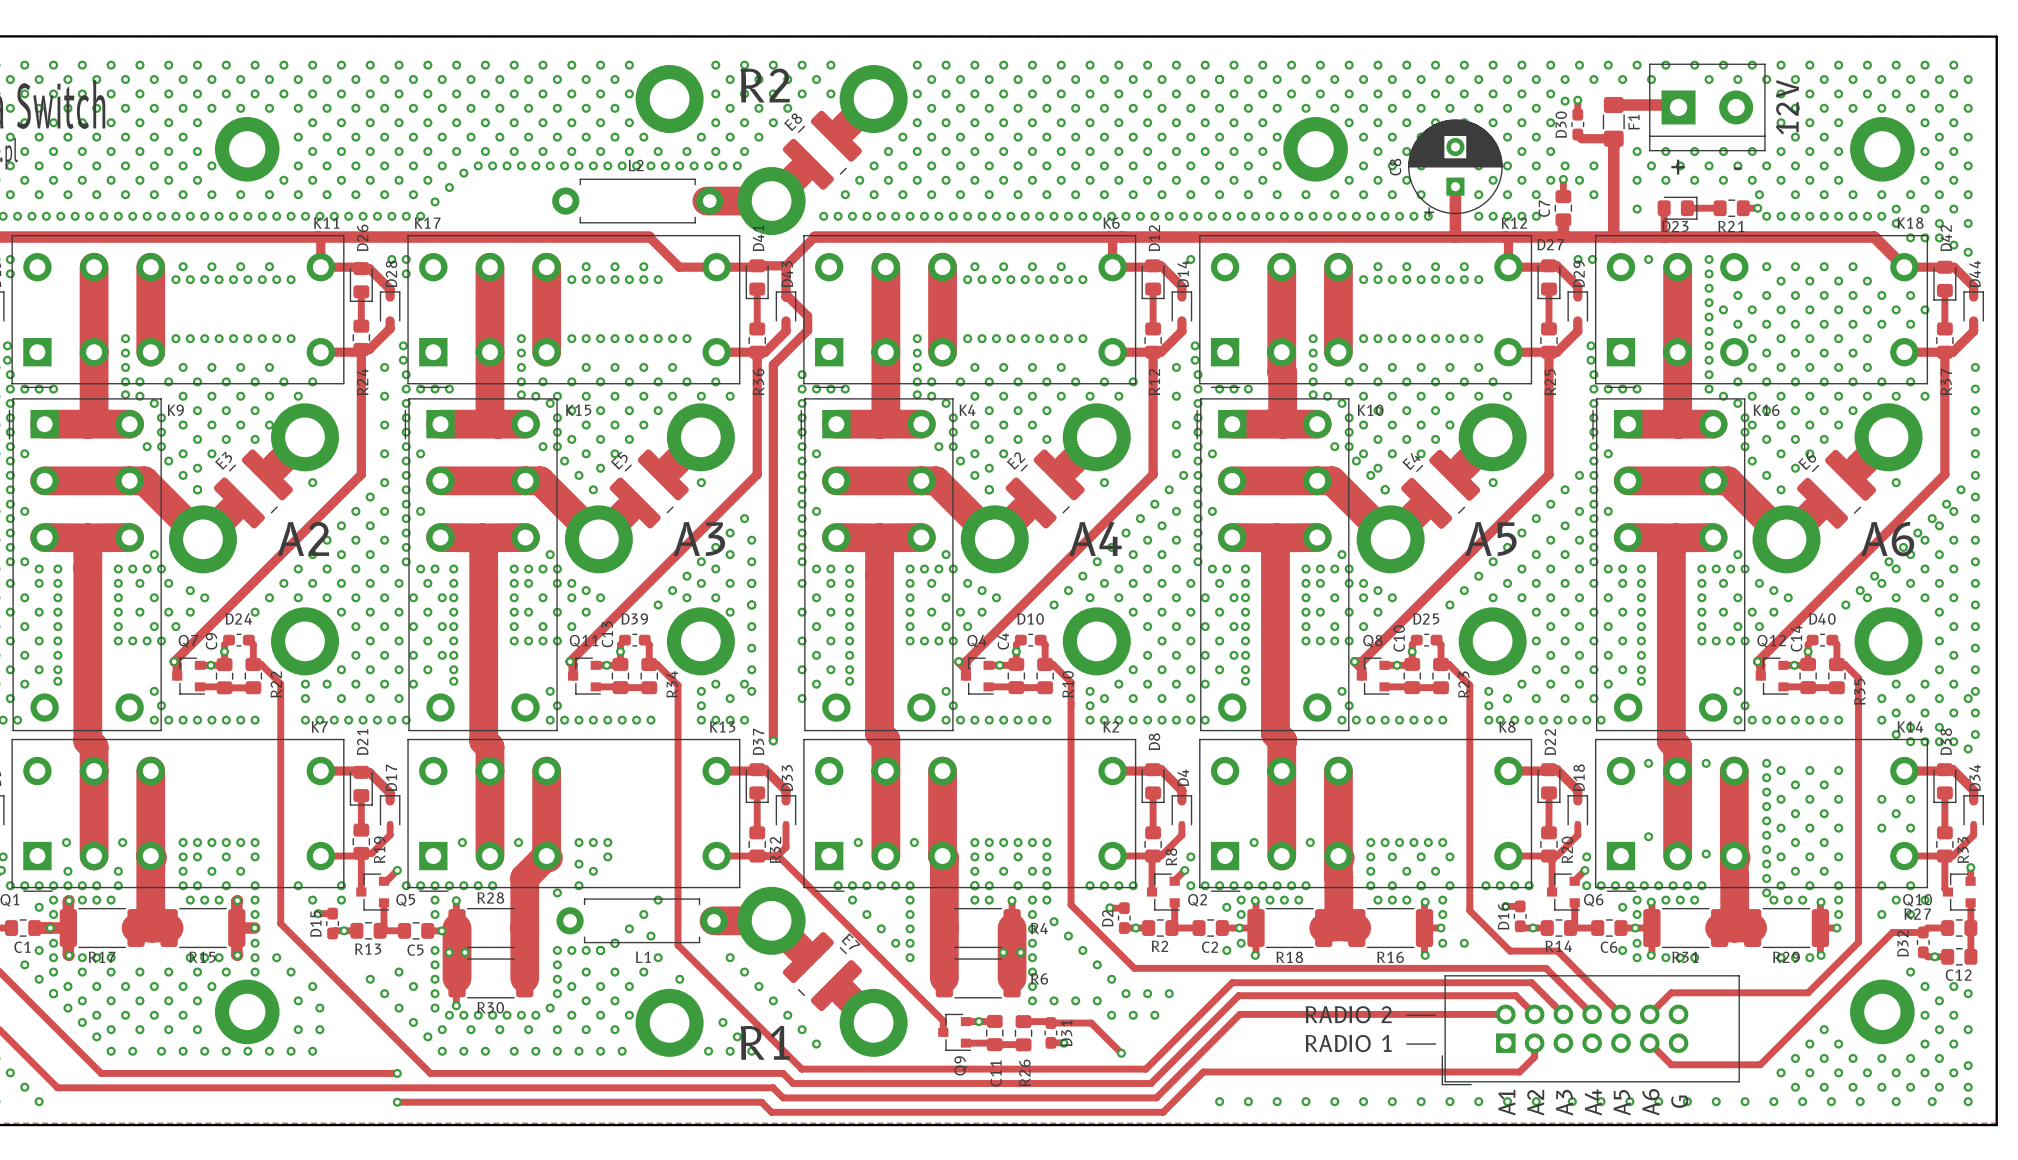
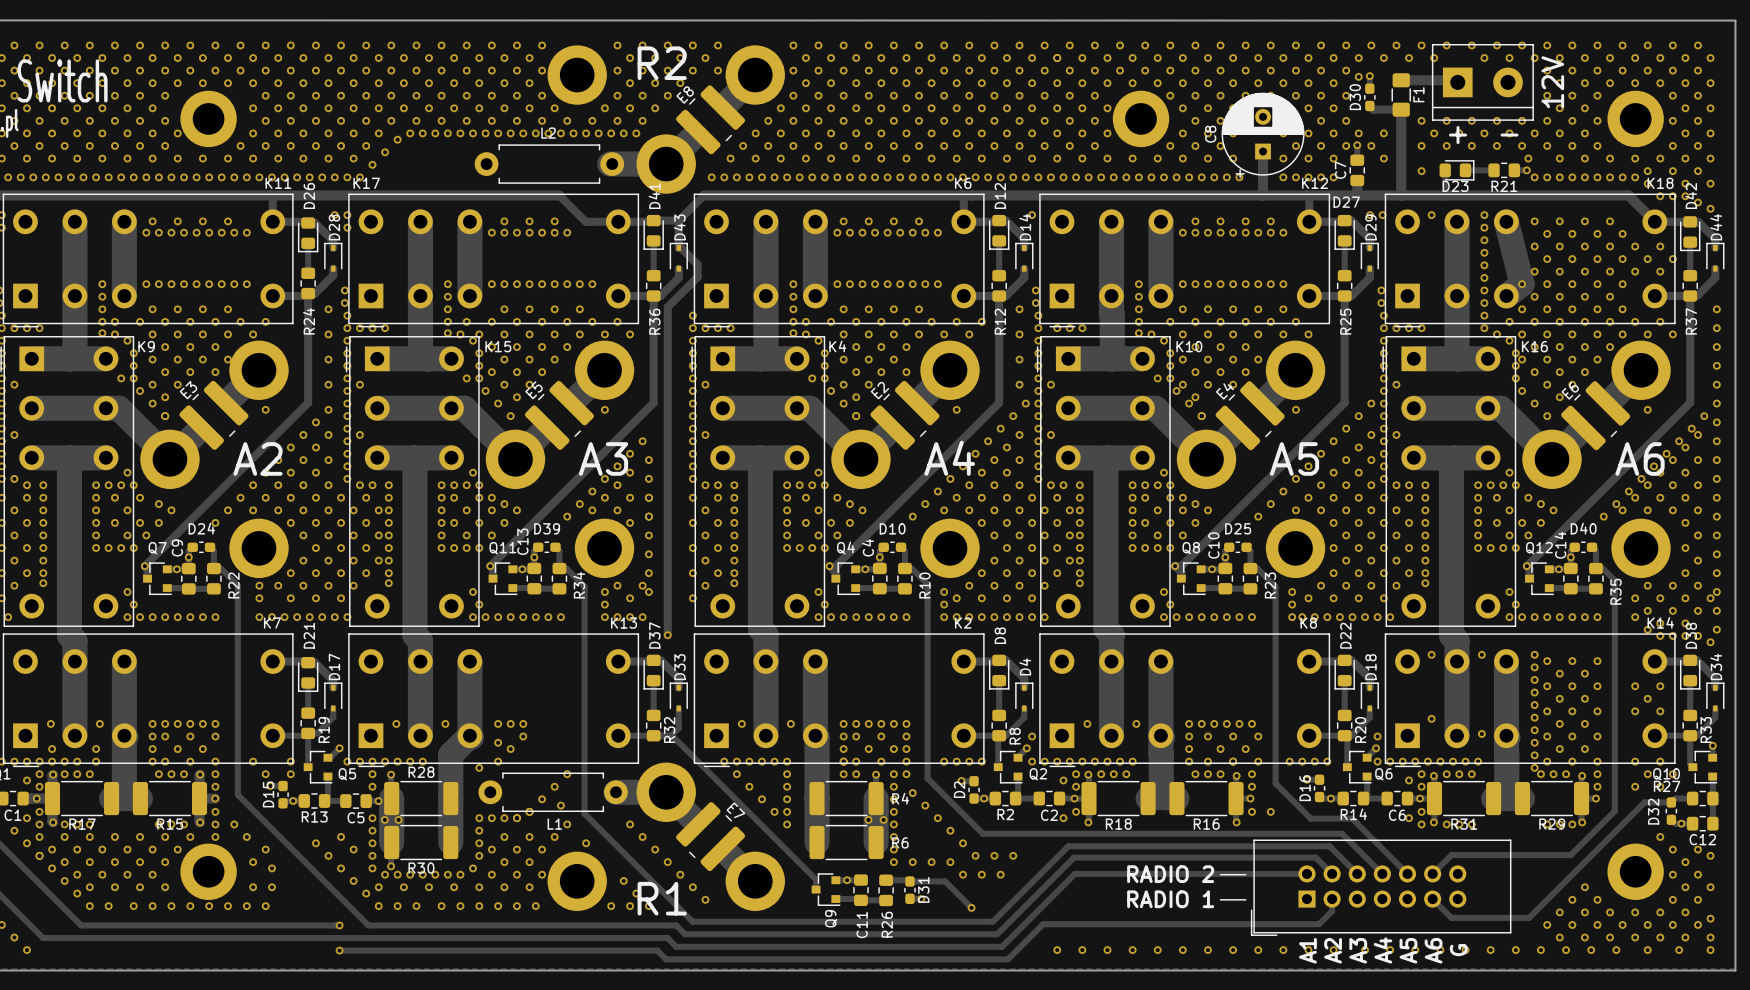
track: none -> (1506, 221) (1522, 284) (1506, 296)
via: (1737, 295) -> none
via: (1723, 309) -> none
via: (1752, 309) -> none
via: (1737, 324) -> none

